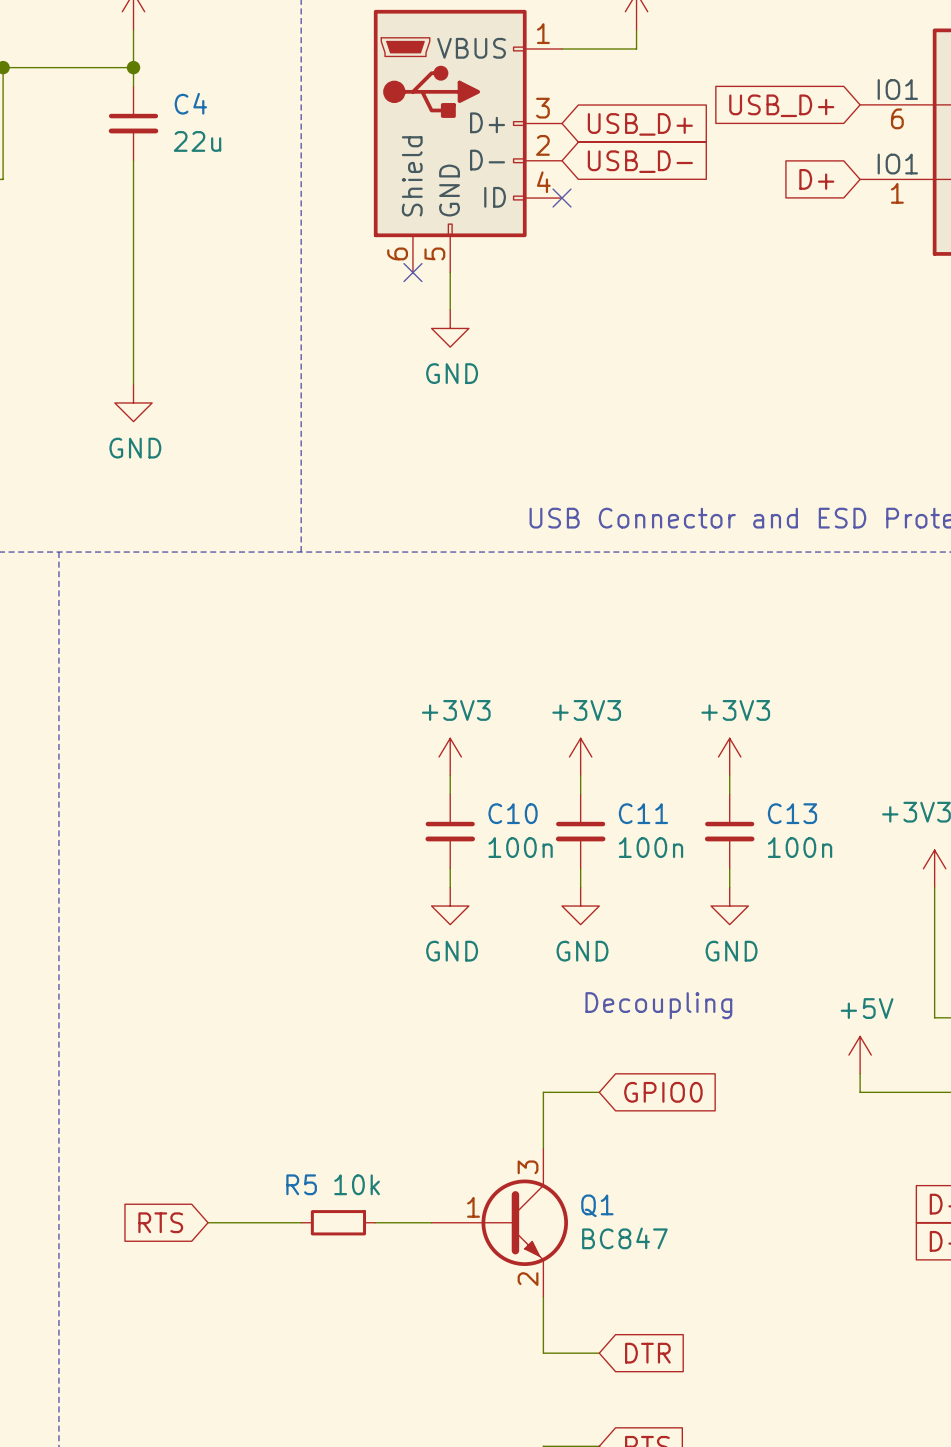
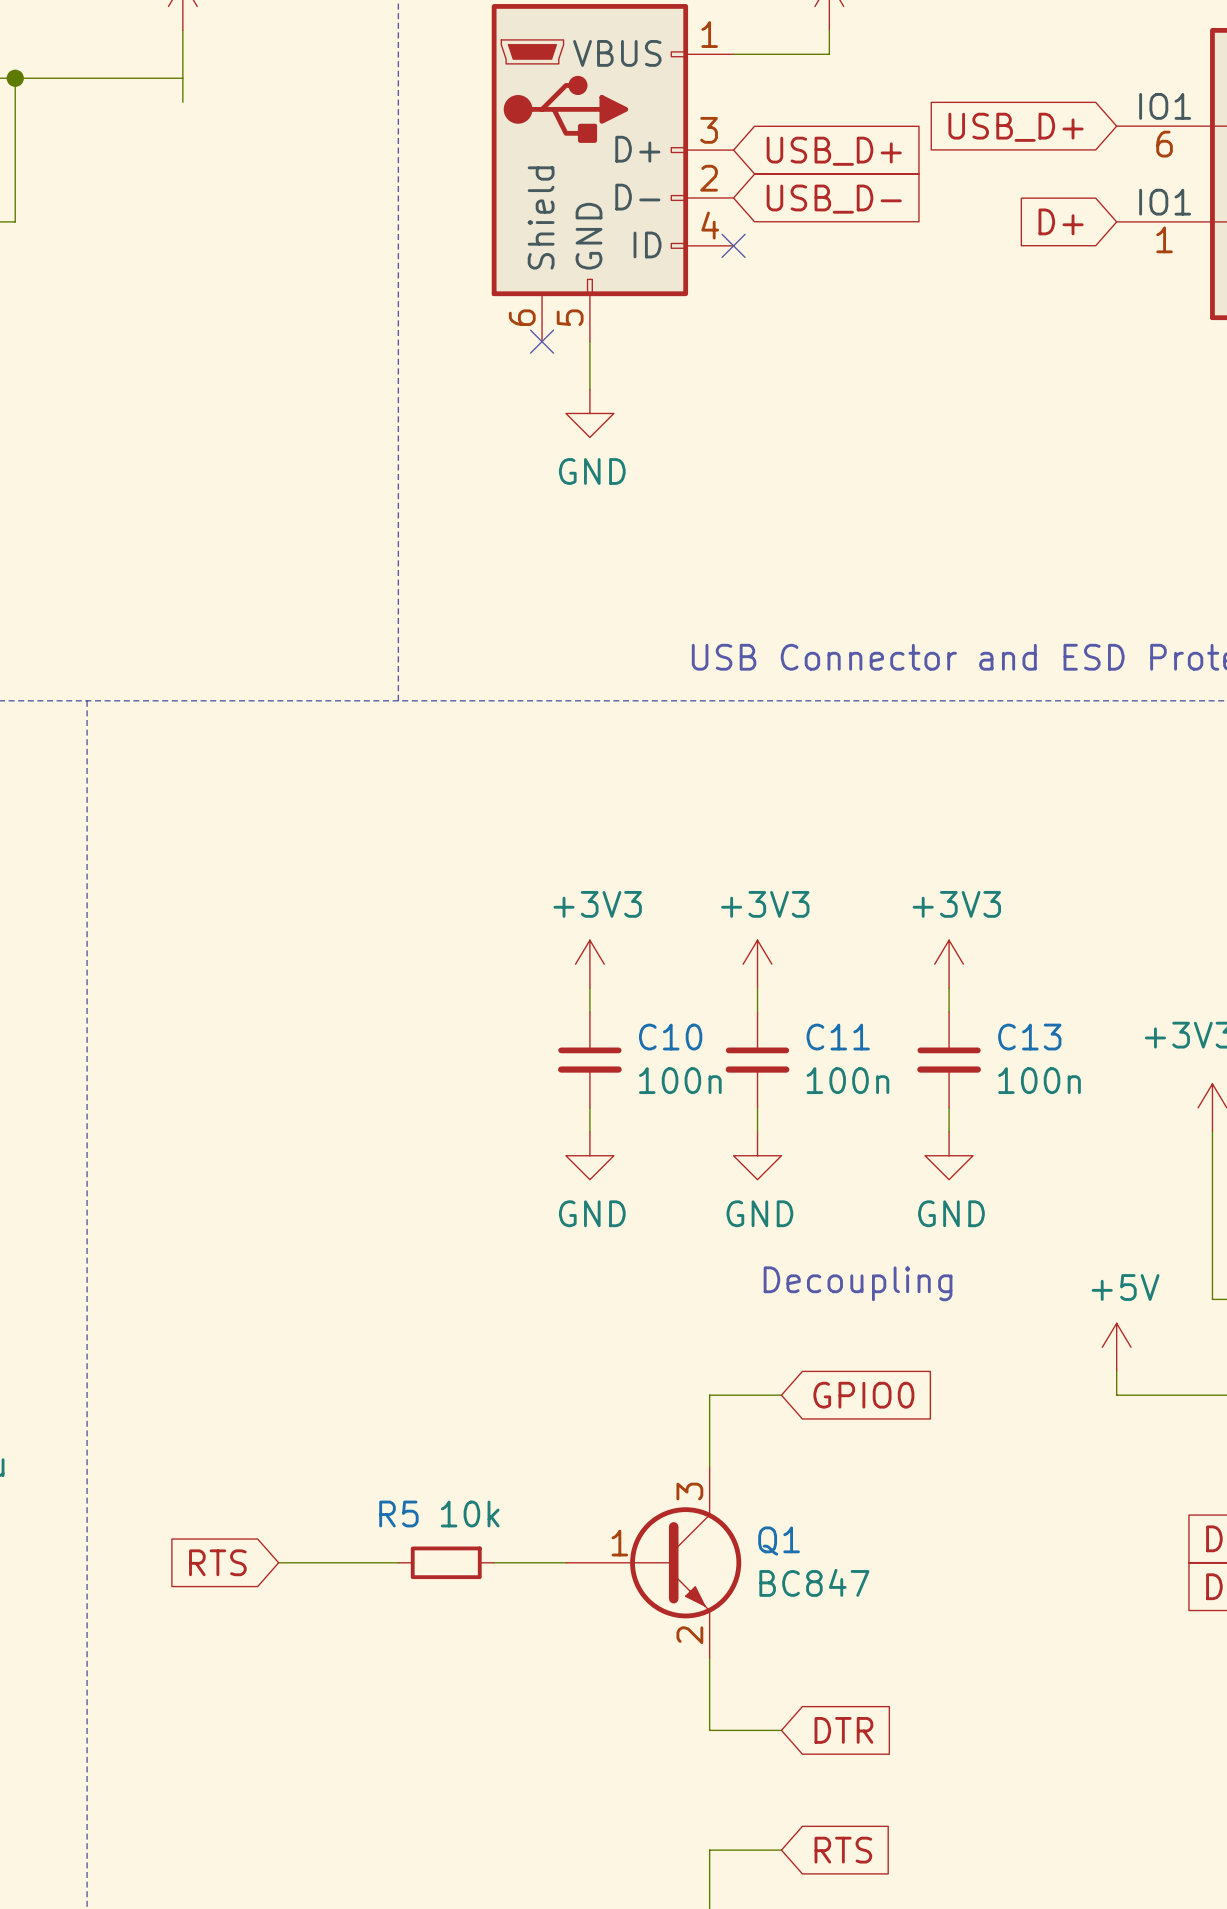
junction: (133, 67) -> none
C4: 22u (133, 123) -> none
wire: (133, 160) (133, 384) -> none
power symbol: GND (133, 402) -> none

